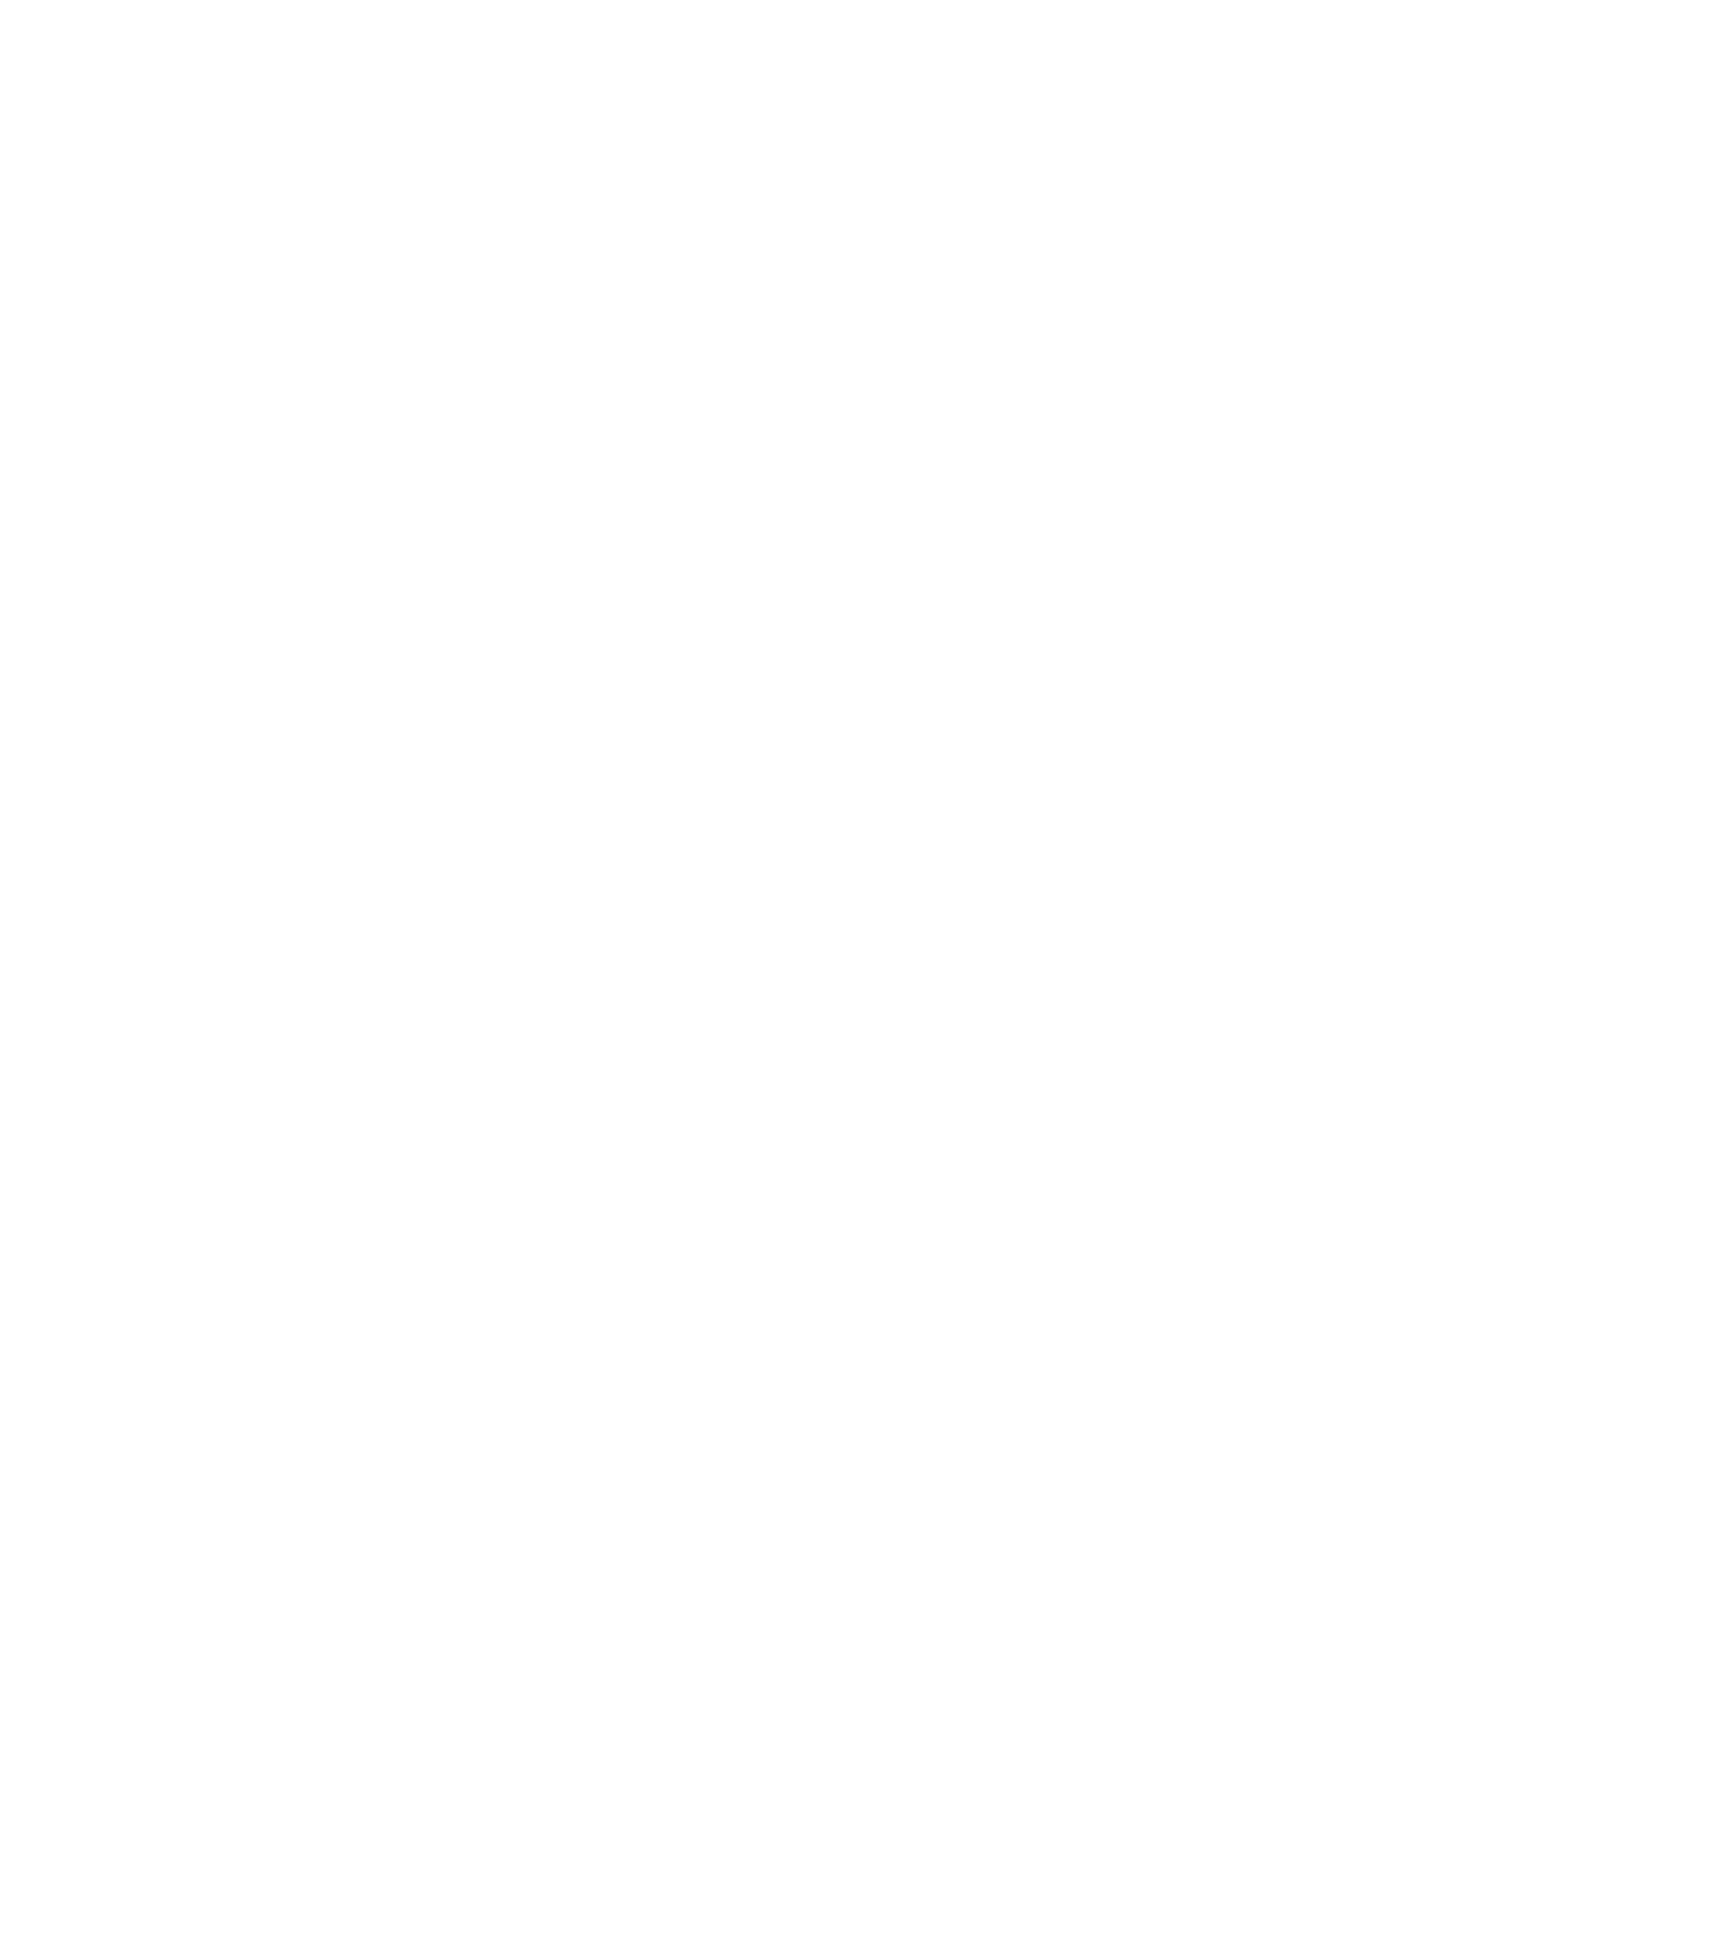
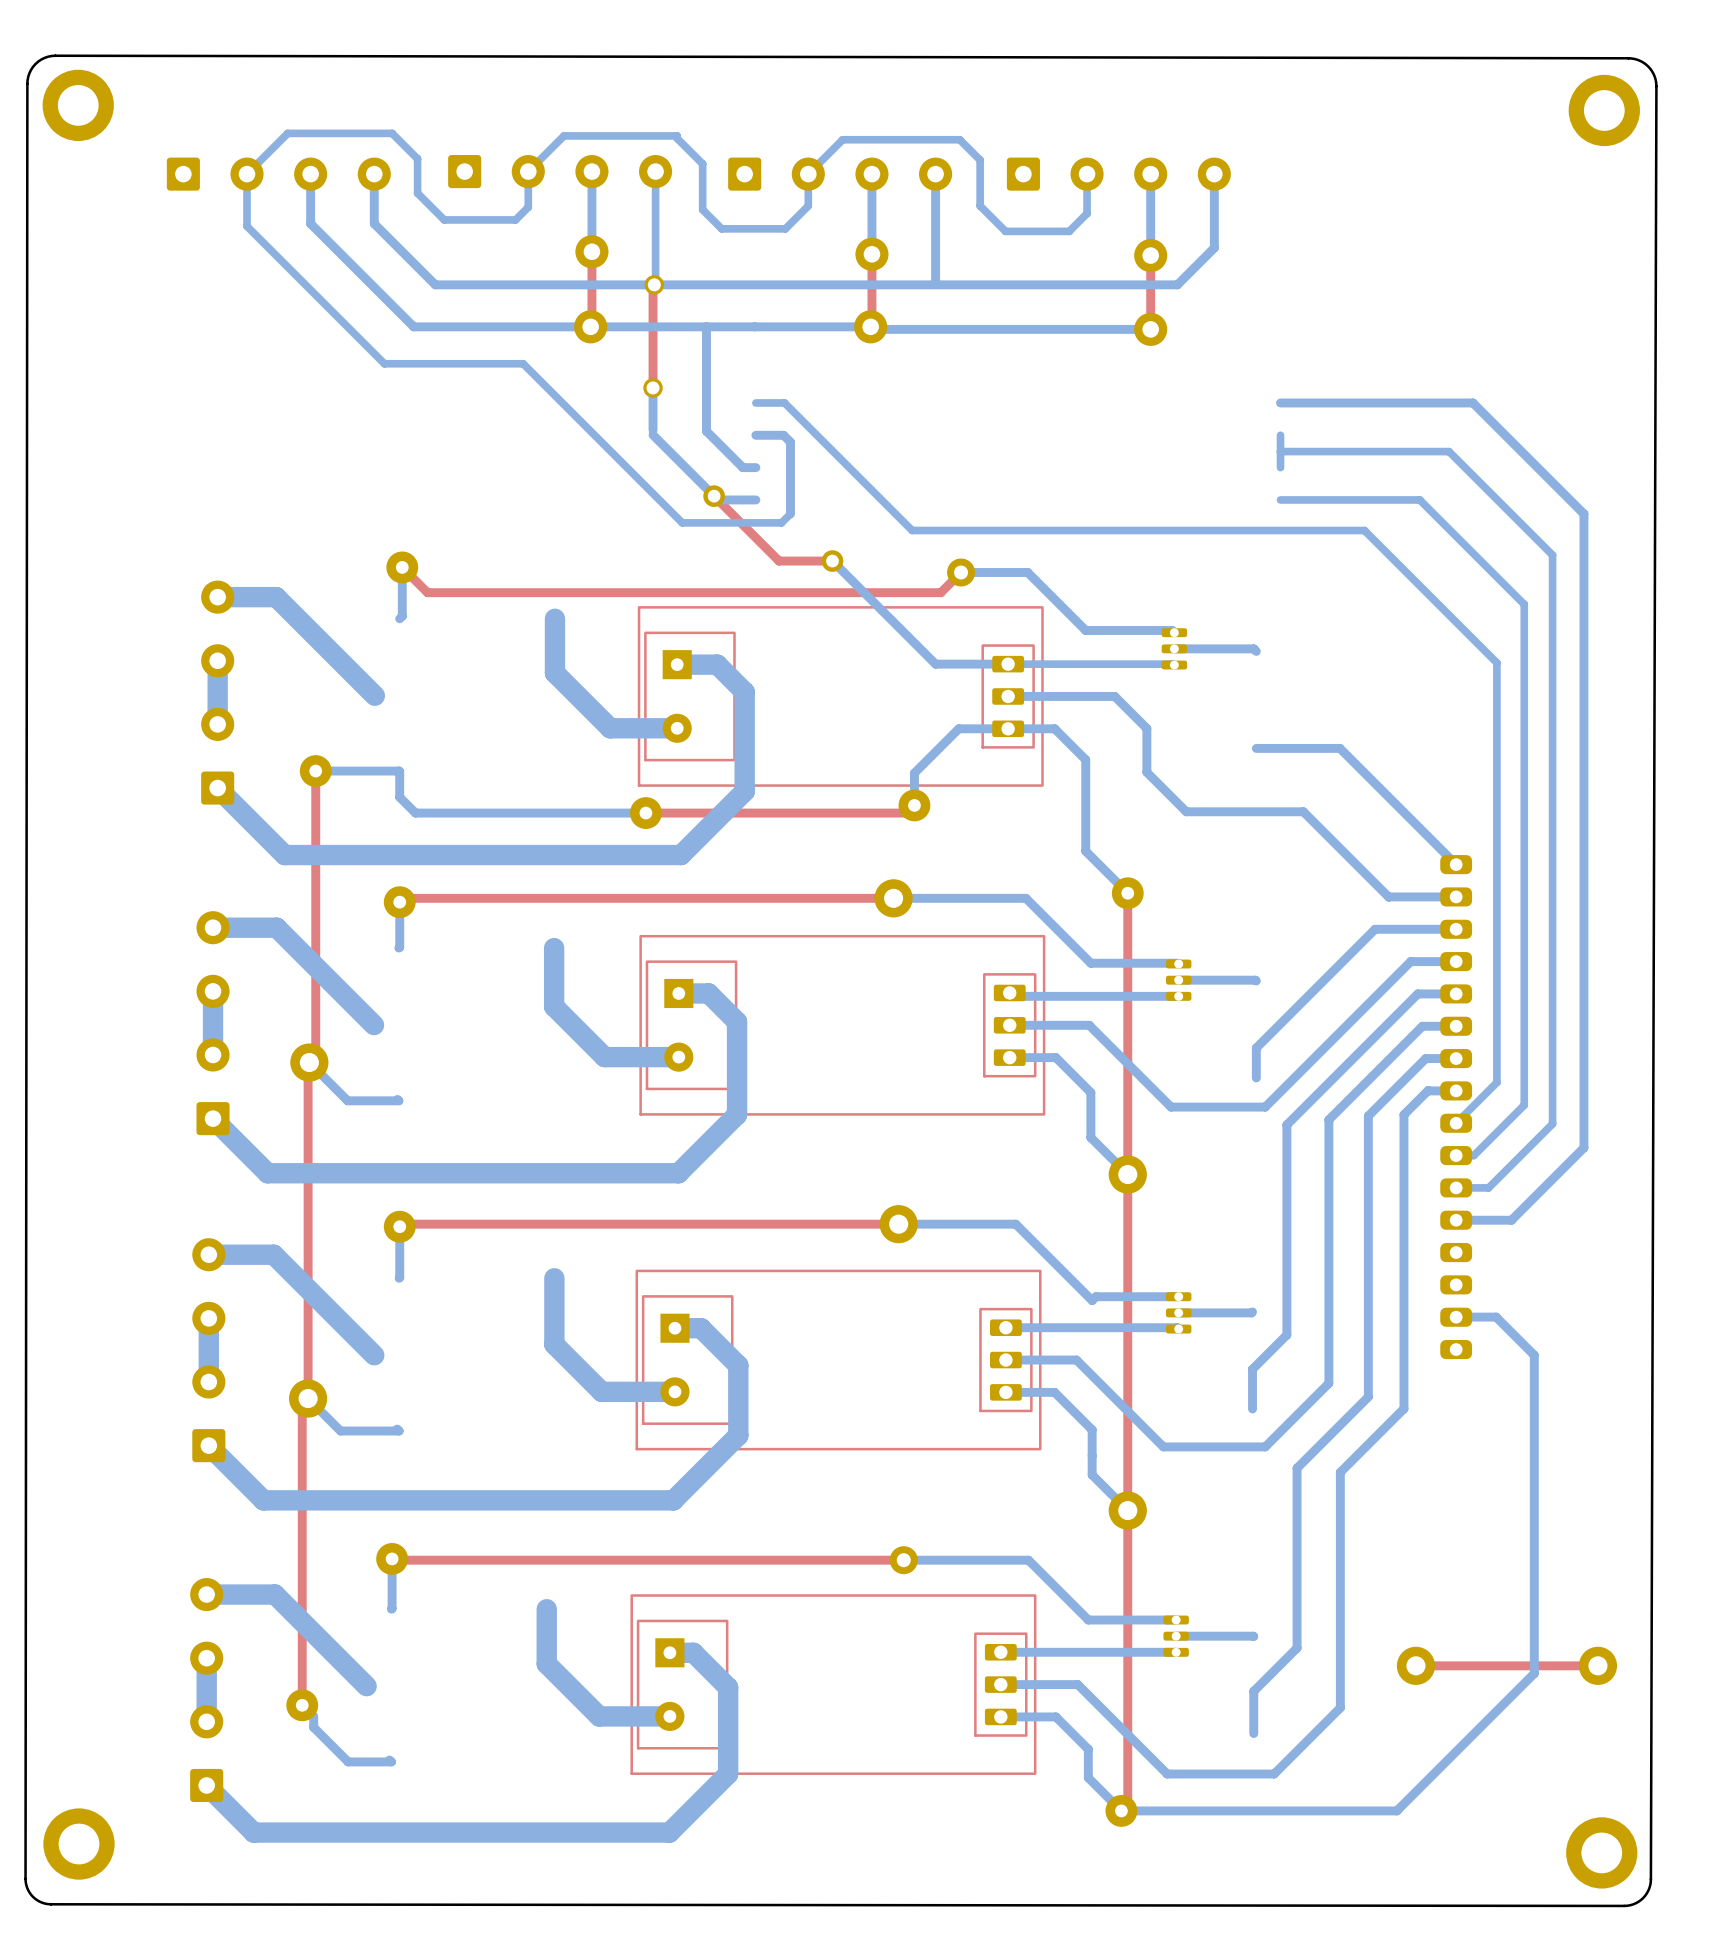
board edge: none -> (55, 55) (1628, 58) (1640, 61) (1650, 68) (1654, 77) (1656, 86) (1650, 1879) (1648, 1890) (1640, 1900) (1624, 1905) (50, 1904) (39, 1901) (31, 1894) (25, 1878) (27, 83) (29, 73) (35, 63) (44, 57) (55, 55)
part: none -> (78, 105)
part: none -> (1604, 110)
part: none -> (560, 171)
bottom track: none -> (591, 171) (591, 251)
bottom track: none -> (655, 171) (654, 284)
part: none -> (278, 174)
bottom track: none -> (310, 174) (310, 223) (413, 326) (870, 326) (873, 329) (1150, 329)
part: none -> (840, 174)
bottom track: none -> (871, 174) (871, 254)
bottom track: none -> (935, 174) (935, 283)
bottom track: none -> (1087, 174) (1087, 213) (1069, 231) (1005, 231) (980, 205) (980, 160) (959, 139) (842, 139) (808, 174) (808, 205) (785, 228) (721, 228) (702, 209) (702, 163) (677, 138) (677, 135) (563, 135) (528, 171) (528, 207) (515, 219) (444, 219) (417, 193) (417, 158) (392, 133) (287, 133) (247, 174) (247, 226) (384, 363) (523, 363) (682, 522) (781, 522) (790, 513) (790, 442) (783, 435) (755, 435)
part: none -> (1118, 174)
bottom track: none -> (1150, 174) (1150, 255)
bottom track: none -> (1214, 174) (1214, 247) (1177, 284) (435, 284) (374, 223) (374, 174)
top track: none -> (591, 251) (590, 326)
part: none -> (591, 251)
top track: none -> (871, 254) (870, 326)
part: none -> (871, 254)
top track: none -> (1150, 255) (1150, 329)
part: none -> (1150, 255)
top track: none -> (654, 284) (653, 387)
part: none -> (654, 284)
part: none -> (590, 326)
bottom track: none -> (706, 326) (706, 431) (742, 467) (755, 467)
part: none -> (870, 326)
part: none -> (1150, 329)
bottom track: none -> (653, 387) (653, 429)
part: none -> (653, 387)
bottom track: none -> (755, 402) (784, 402) (912, 530) (1364, 530) (1496, 662) (1496, 1082) (1456, 1123)
bottom track: none -> (1280, 402) (1472, 402) (1583, 513) (1583, 1147) (1511, 1220) (1456, 1220)
bottom track: none -> (653, 435) (717, 499) (755, 499)
bottom track: none -> (1280, 435) (1280, 467)
bottom track: none -> (1280, 451) (1449, 451) (1552, 555) (1552, 1123) (1488, 1187) (1456, 1187)
top track: none -> (714, 496) (779, 561) (832, 561)
part: none -> (714, 496)
bottom track: none -> (1280, 499) (1419, 499) (1524, 604) (1524, 1105) (1473, 1155) (1456, 1155)
bottom track: none -> (832, 561) (935, 664) (1174, 665)
part: none -> (832, 561)
top track: none -> (402, 567) (427, 592) (940, 592) (961, 572)
bottom track: none -> (402, 567) (402, 616) (399, 618)
part: none -> (402, 567)
bottom track: none -> (961, 572) (1027, 572) (1085, 630) (1172, 630) (1174, 632)
part: none -> (961, 572)
bottom track: none -> (217, 597) (276, 597) (374, 695)
bottom track: none -> (554, 618) (554, 673) (610, 728) (677, 728)
bottom track: none -> (1174, 648) (1253, 648) (1256, 651)
part: none -> (1174, 648)
bottom track: none -> (217, 660) (217, 724)
bottom track: none -> (677, 664) (717, 664) (744, 692) (744, 791) (681, 855) (284, 855) (217, 788)
part: none -> (217, 692)
part: none -> (840, 696)
bottom track: none -> (1008, 696) (1114, 696) (1146, 728) (1146, 772) (1186, 811) (1303, 811) (1388, 897)
bottom track: none -> (1256, 748) (1339, 748) (1456, 864)
bottom track: none -> (314, 769) (399, 771) (399, 797) (415, 813) (645, 813)
top track: none -> (315, 771) (315, 1056) (308, 1063) (308, 1398) (302, 1404) (302, 1705)
part: none -> (315, 771)
top track: none -> (914, 805) (906, 813) (645, 813)
bottom track: none -> (914, 805) (914, 773) (958, 728) (1054, 728) (1085, 759) (1085, 851) (1127, 893)
part: none -> (914, 805)
part: none -> (645, 813)
top track: none -> (1127, 893) (1127, 1804) (1121, 1810)
part: none -> (1127, 893)
bottom track: none -> (1456, 896) (1388, 896)
top track: none -> (893, 898) (403, 898) (399, 902)
bottom track: none -> (893, 898) (1025, 898) (1090, 963) (1178, 964)
part: none -> (893, 898)
bottom track: none -> (399, 902) (398, 948)
part: none -> (399, 902)
bottom track: none -> (213, 927) (276, 927) (374, 1025)
bottom track: none -> (1456, 929) (1375, 929) (1256, 1048) (1256, 1077)
bottom track: none -> (554, 948) (554, 1006) (604, 1057) (678, 1057)
bottom track: none -> (1456, 961) (1410, 961) (1265, 1107) (1171, 1107) (1089, 1025) (1009, 1025)
bottom track: none -> (1178, 980) (1256, 980)
part: none -> (1178, 980)
bottom track: none -> (213, 991) (213, 1054)
bottom track: none -> (1009, 992) (1013, 996) (1178, 996)
bottom track: none -> (678, 993) (708, 993) (737, 1021) (737, 1114) (678, 1173) (267, 1173) (213, 1118)
bottom track: none -> (1456, 993) (1417, 993) (1286, 1124) (1286, 1334) (1252, 1369) (1252, 1408)
part: none -> (213, 1023)
part: none -> (842, 1025)
bottom track: none -> (1456, 1026) (1422, 1026) (1328, 1119) (1328, 1383) (1265, 1446) (1163, 1446) (1076, 1360) (1005, 1360)
bottom track: none -> (1009, 1057) (1055, 1057) (1090, 1092) (1090, 1137) (1127, 1174)
bottom track: none -> (1456, 1058) (1425, 1058) (1368, 1115) (1368, 1396) (1297, 1468) (1297, 1648) (1253, 1691) (1253, 1733)
bottom track: none -> (309, 1062) (347, 1100) (398, 1100) (397, 1099)
part: none -> (309, 1062)
bottom track: none -> (1456, 1090) (1428, 1090) (1403, 1114) (1403, 1408) (1340, 1472) (1340, 1707) (1274, 1774) (1167, 1774) (1077, 1684) (1000, 1684)
part: none -> (1456, 1107)
part: none -> (1127, 1174)
top track: none -> (898, 1224) (402, 1224) (399, 1226)
bottom track: none -> (898, 1224) (1015, 1224) (1092, 1300) (1095, 1296) (1178, 1296)
part: none -> (898, 1224)
bottom track: none -> (399, 1226) (399, 1278)
part: none -> (399, 1226)
bottom track: none -> (208, 1254) (273, 1254) (374, 1355)
bottom track: none -> (554, 1278) (554, 1344) (601, 1391) (674, 1391)
bottom track: none -> (1252, 1311) (1178, 1312)
part: none -> (1178, 1312)
bottom track: none -> (1456, 1317) (1496, 1317) (1534, 1355) (1534, 1673) (1396, 1810) (1121, 1810) (1088, 1777) (1088, 1749) (1055, 1716) (1000, 1716)
bottom track: none -> (208, 1318) (208, 1382)
bottom track: none -> (1005, 1327) (1178, 1329)
bottom track: none -> (674, 1328) (701, 1328) (738, 1365) (738, 1435) (673, 1500) (263, 1500) (208, 1445)
part: none -> (208, 1350)
part: none -> (838, 1360)
bottom track: none -> (1005, 1392) (1054, 1392) (1092, 1429) (1092, 1474) (1127, 1510)
bottom track: none -> (308, 1398) (340, 1431) (399, 1431) (397, 1429)
part: none -> (308, 1398)
part: none -> (1127, 1510)
top track: none -> (392, 1558) (903, 1560)
bottom track: none -> (392, 1558) (391, 1609)
part: none -> (392, 1558)
bottom track: none -> (903, 1560) (1028, 1560) (1088, 1620) (1176, 1620)
part: none -> (903, 1560)
bottom track: none -> (206, 1594) (275, 1594) (366, 1686)
bottom track: none -> (546, 1609) (546, 1663) (599, 1716) (669, 1716)
bottom track: none -> (1176, 1636) (1253, 1636)
part: none -> (1176, 1636)
bottom track: none -> (669, 1652) (693, 1652) (728, 1687) (728, 1774) (669, 1832) (253, 1832) (206, 1785)
bottom track: none -> (1176, 1652) (1000, 1652)
bottom track: none -> (206, 1658) (206, 1721)
part: none -> (1415, 1665)
top track: none -> (1597, 1665) (1415, 1665)
part: none -> (1597, 1665)
part: none -> (833, 1684)
part: none -> (206, 1690)
bottom track: none -> (302, 1705) (313, 1716) (313, 1727) (348, 1761) (391, 1761) (389, 1760)
part: none -> (302, 1705)
part: none -> (1121, 1810)
part: none -> (79, 1844)
part: none -> (1601, 1852)

